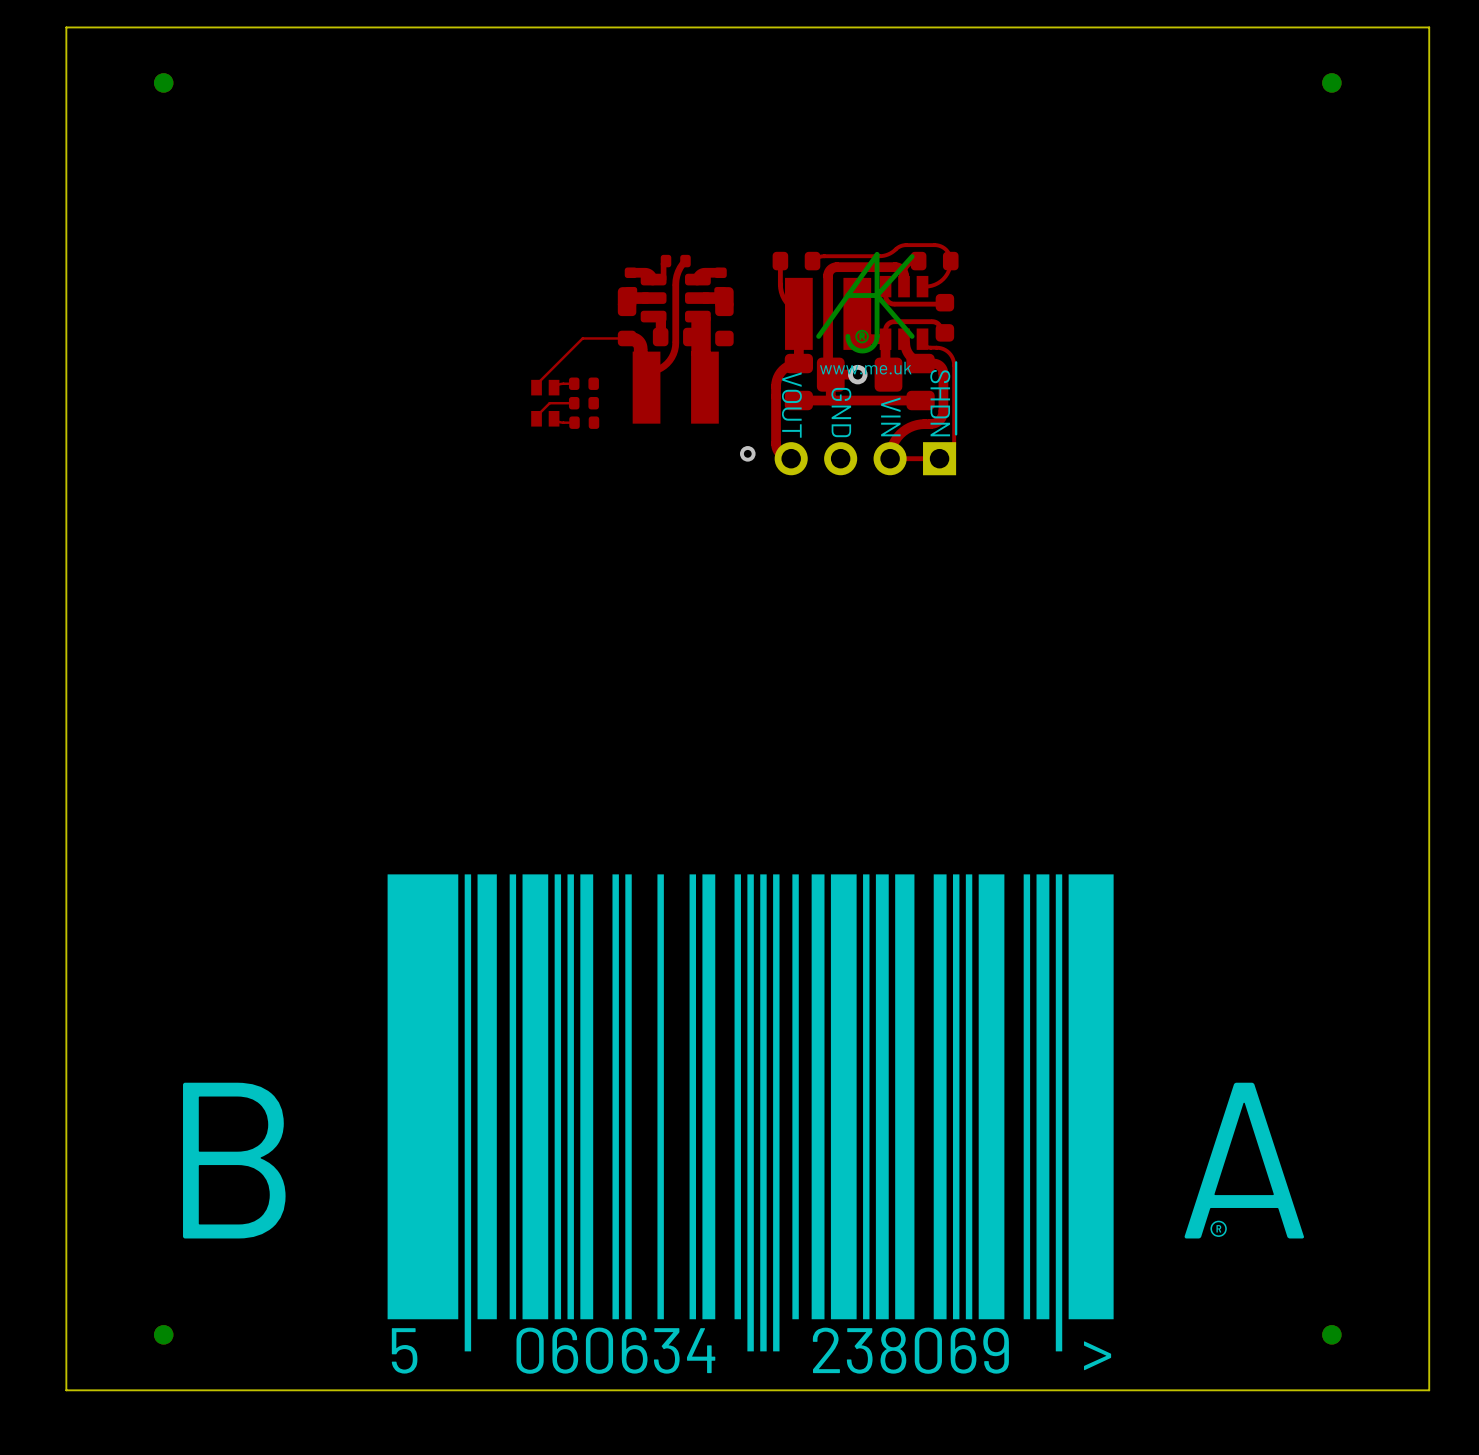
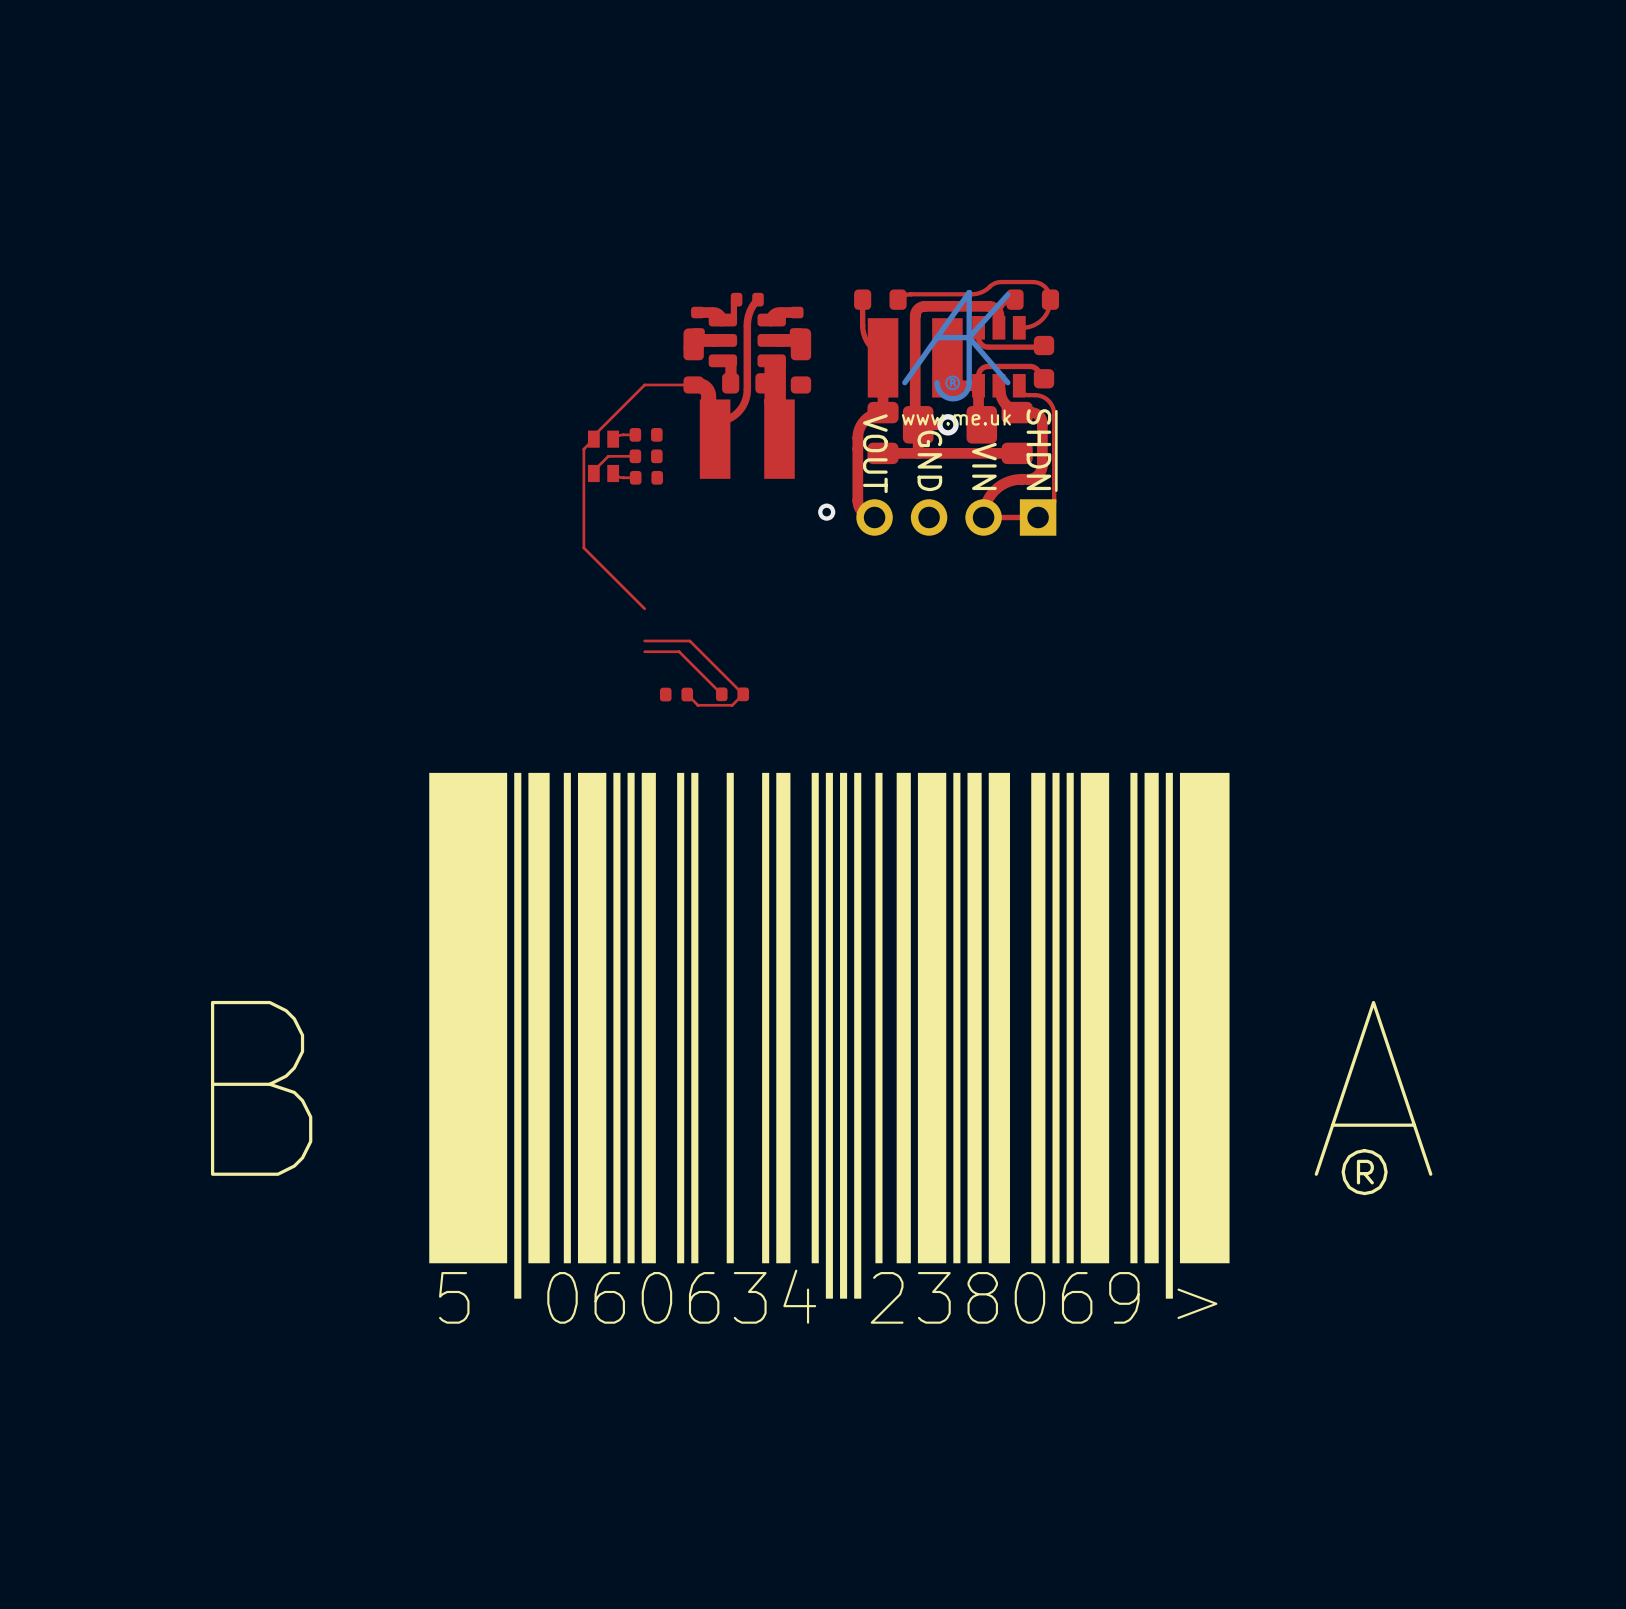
board edge: (1429, 27) (66, 27) (66, 1390) (1429, 1390) (1429, 27) -> none
part: (163, 82) -> none
part: (1331, 82) -> none
top track: none -> (593, 439) (583, 449) (583, 547) (644, 608)
top track: none -> (644, 641) (689, 641) (743, 694) (732, 705) (697, 705) (687, 694)
top track: none -> (644, 651) (679, 651) (721, 694)
part: none -> (676, 694)
part: none -> (732, 694)
drawing position: (750, 1112) -> (829, 1035)
text position: B (234, 1160) -> B (261, 1088)
text position: A (1244, 1160) -> A (1373, 1088)
text position: ® (1218, 1228) -> ® (1364, 1172)
part: (163, 1334) -> none
part: (1331, 1334) -> none

